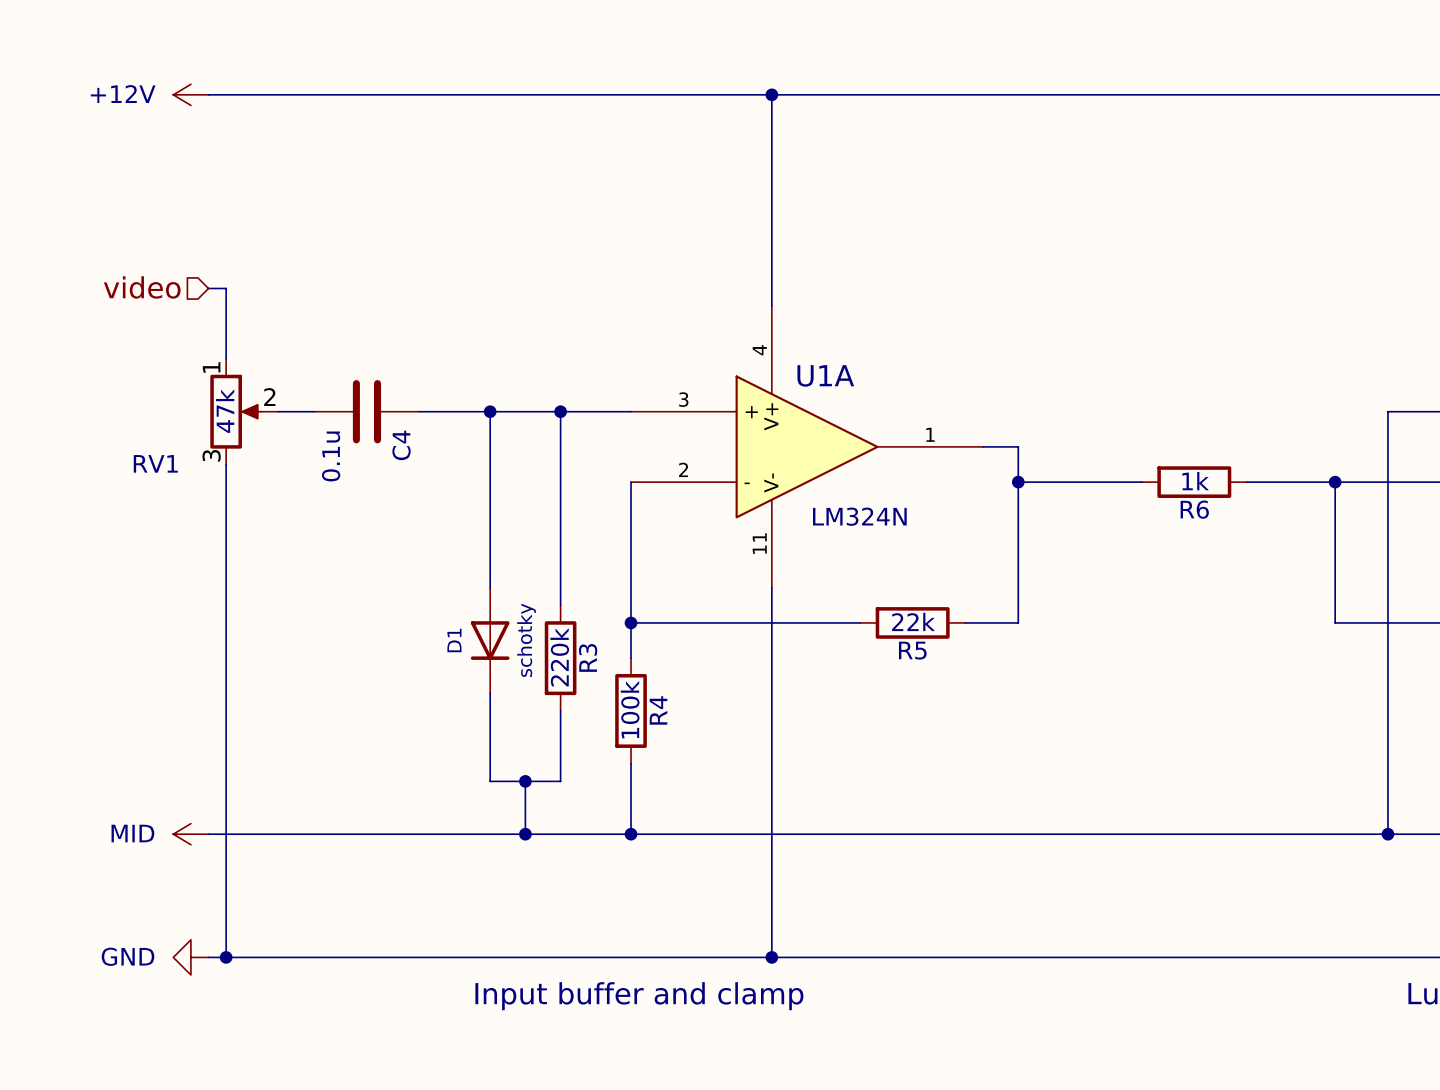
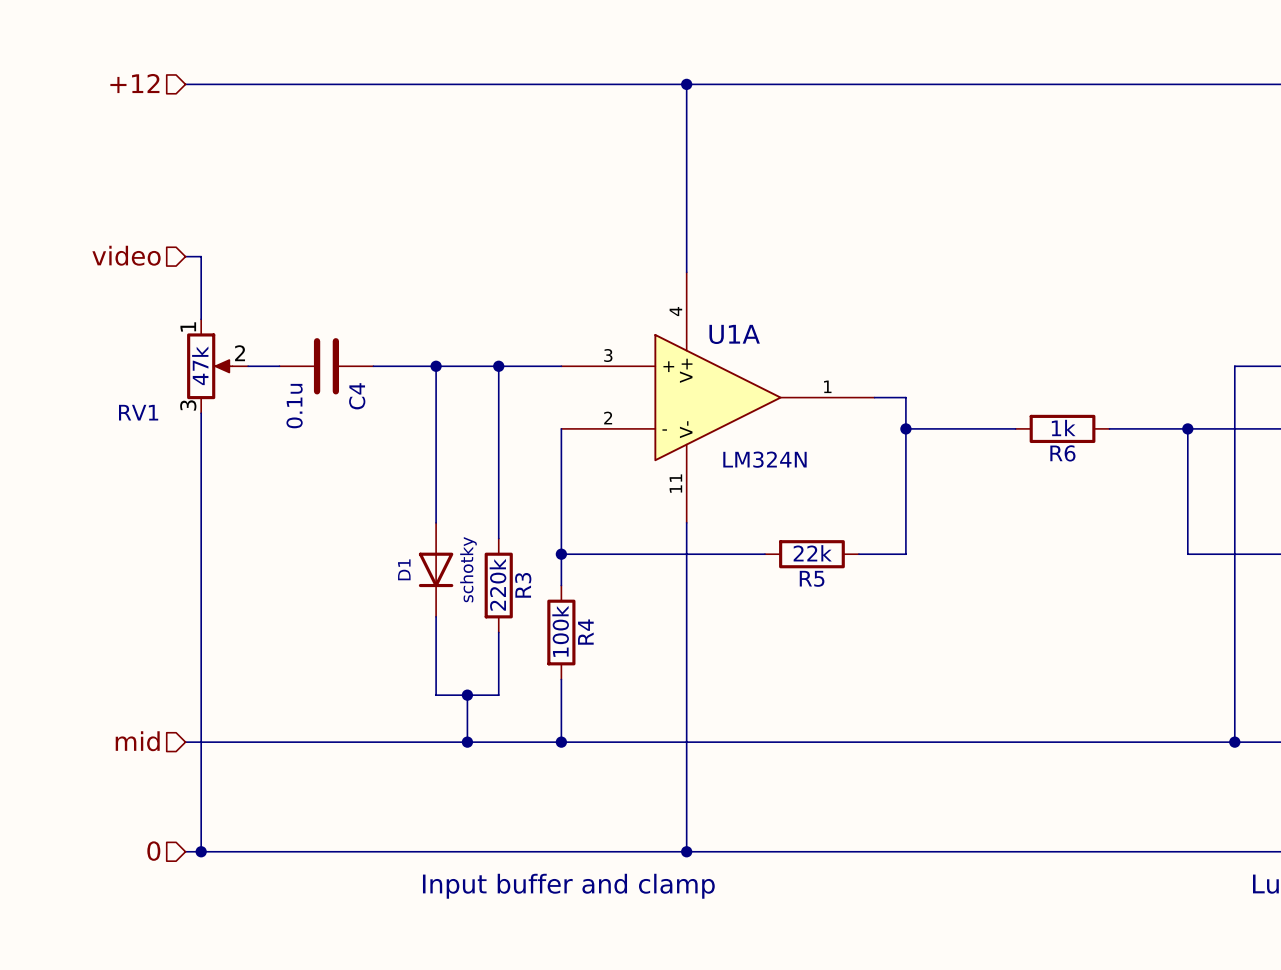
hierarchical label: none -> +12 (134, 83)
power symbol: +12V (190, 94) -> none
hierarchical label: none -> mid (137, 741)
power symbol: MID (190, 834) -> none
hierarchical label: none -> 0 (153, 851)
power symbol: GND (190, 957) -> none

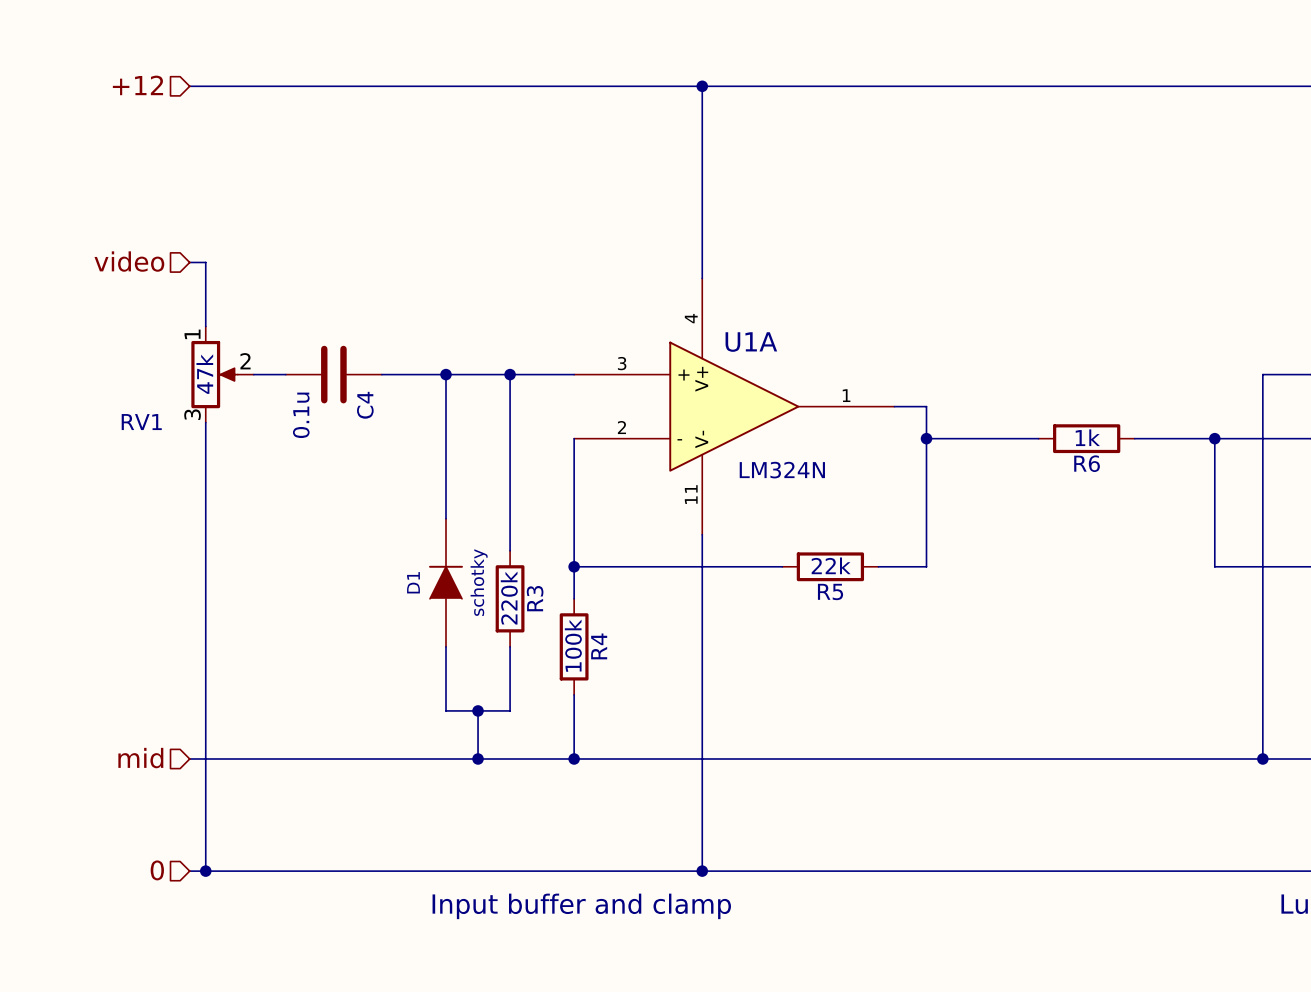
D1 symbol: [418, 522, 454, 617] -> [429, 518, 463, 647]

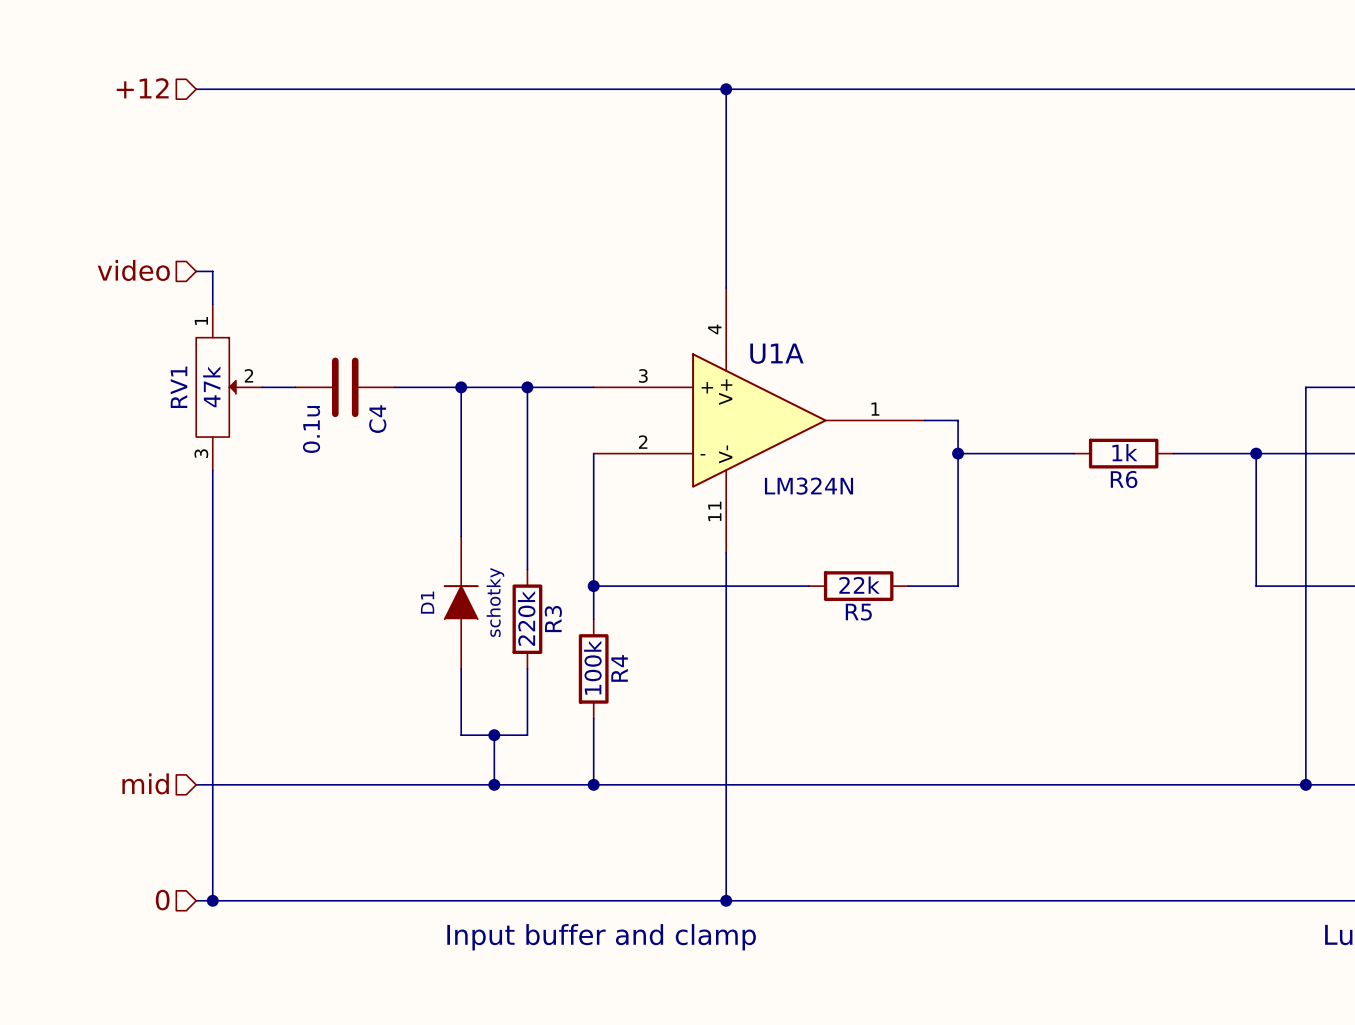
RV1 symbol: [191, 326, 254, 423] -> [196, 304, 263, 471]
RV1 name position: RV1 (141, 422) -> RV1 (179, 387)

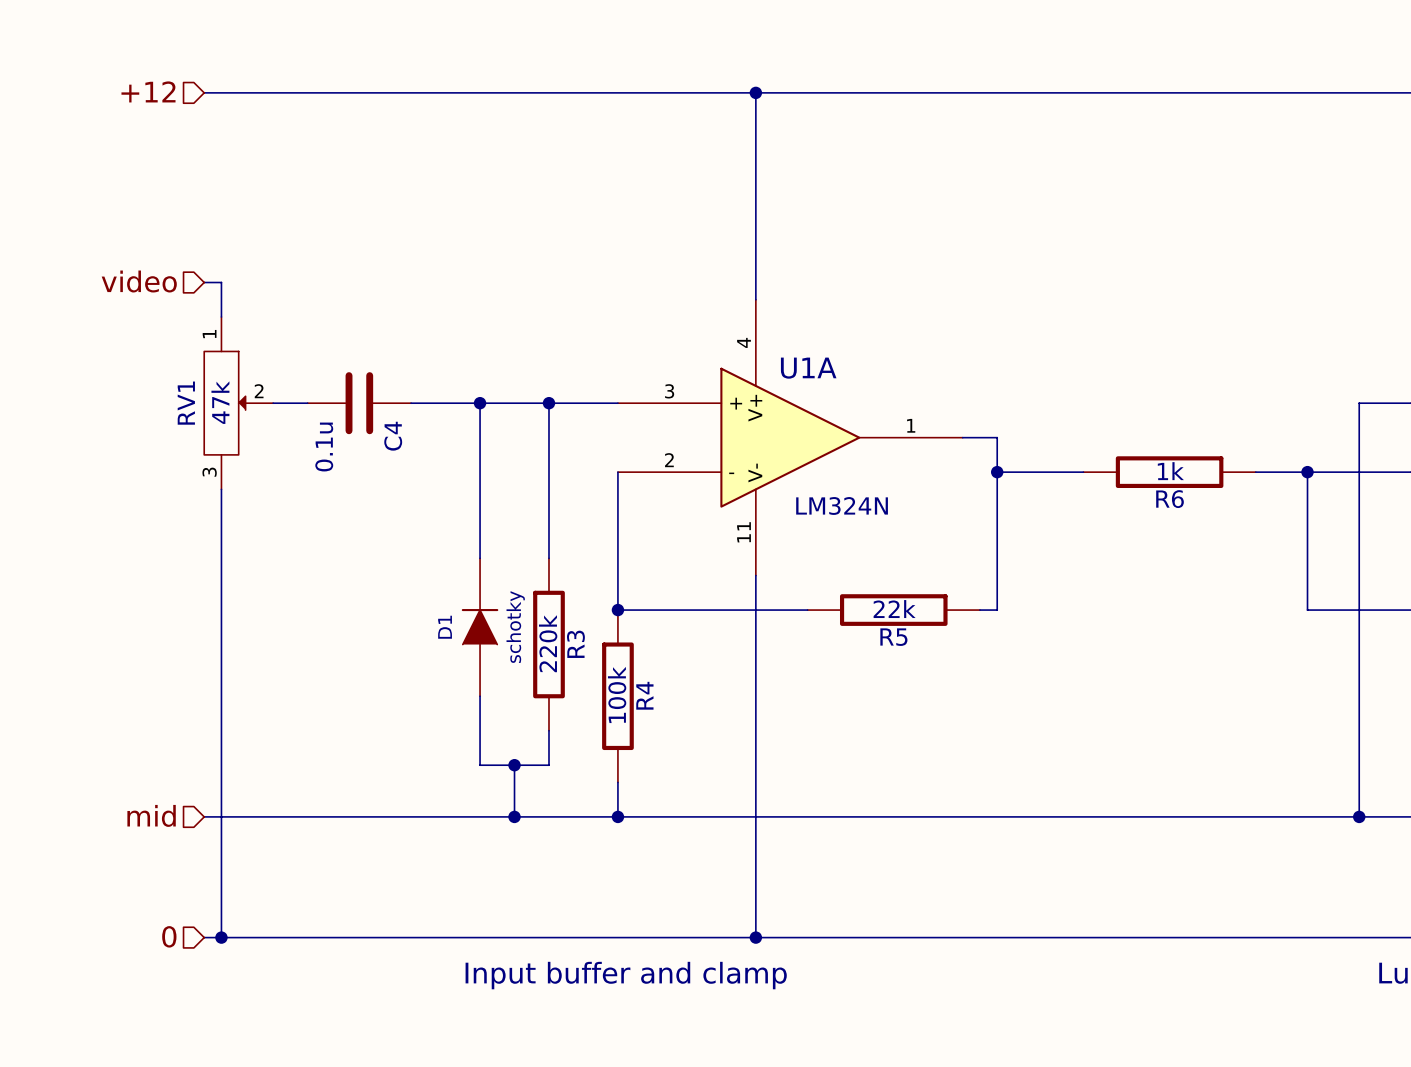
R6 symbol: [1074, 438, 1174, 469] -> [1083, 456, 1256, 489]
R3 symbol: [512, 569, 543, 669] -> [533, 558, 565, 731]
R5 symbol: [809, 571, 909, 602] -> [807, 594, 980, 626]
R4 symbol: [578, 619, 609, 719] -> [602, 610, 634, 783]

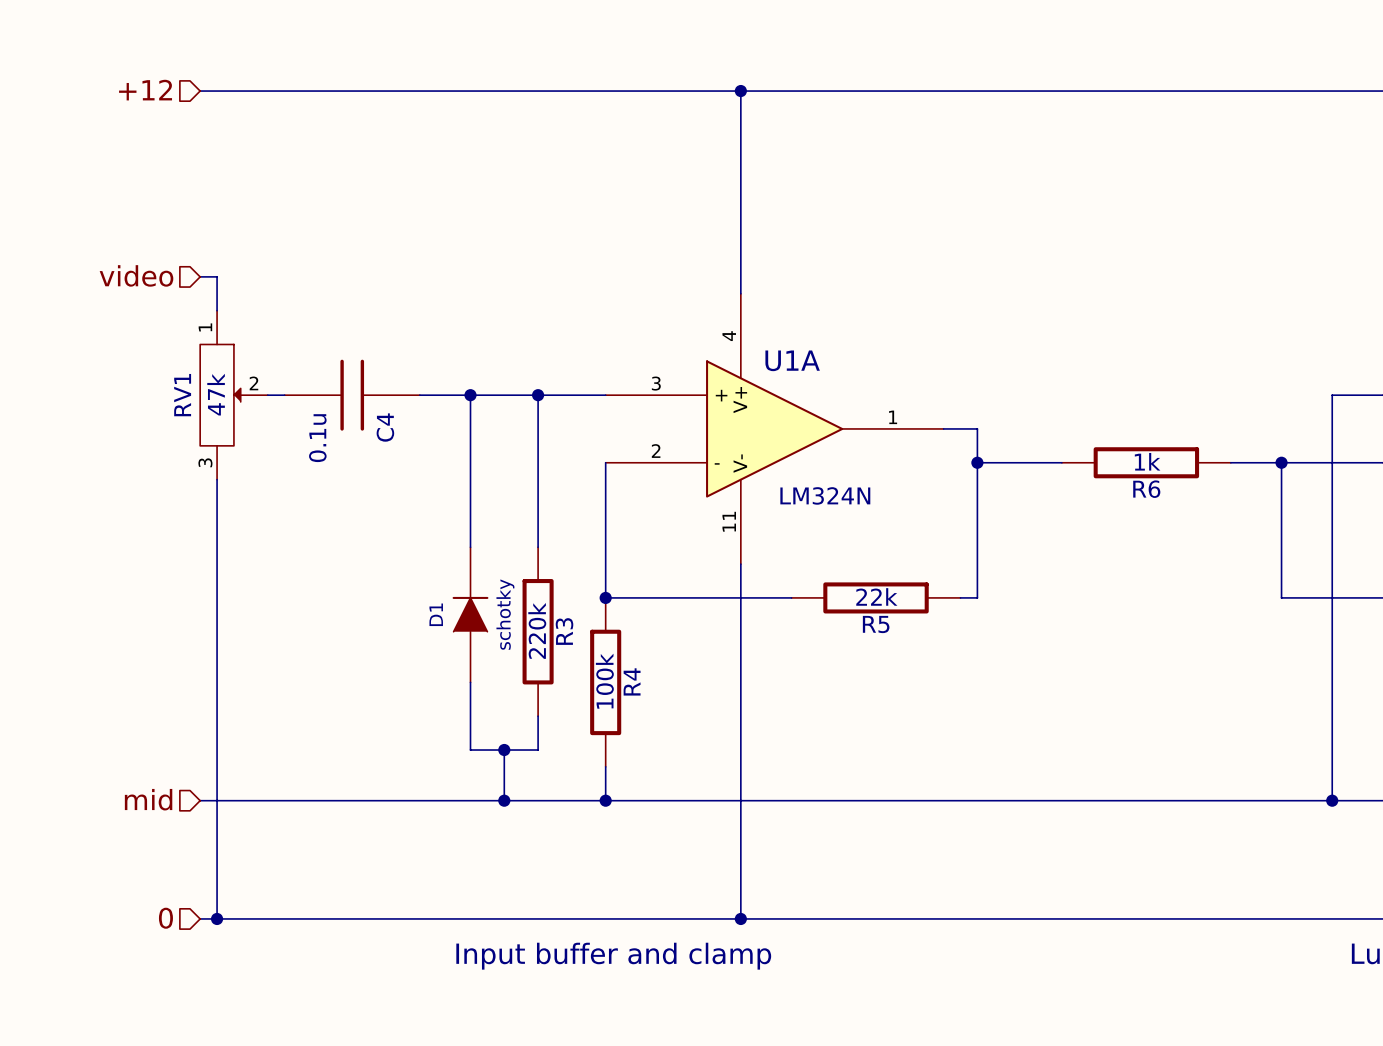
C4 symbol: [307, 372, 412, 435] -> [284, 359, 420, 431]

